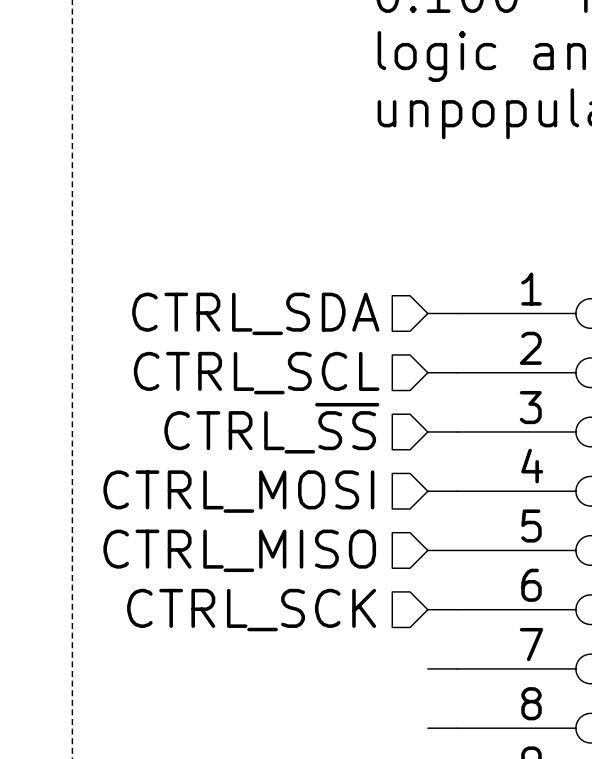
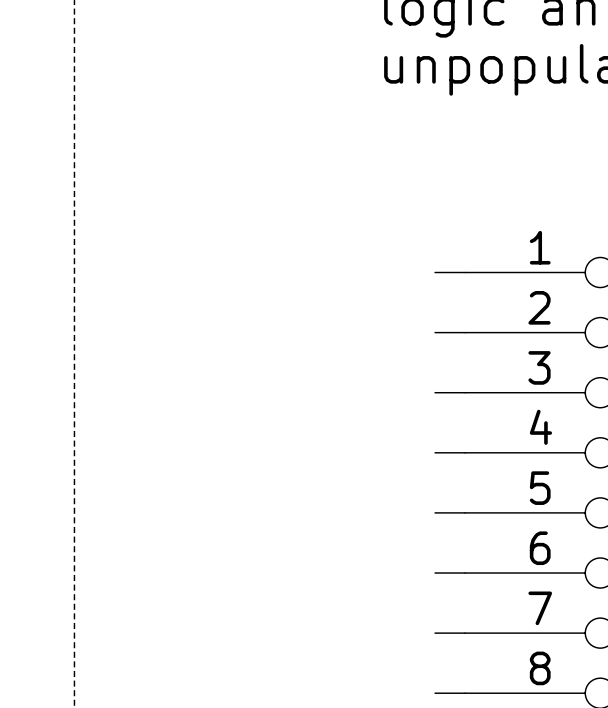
hierarchical label: CTRL_SDA (255, 313) -> none
hierarchical label: CTRL_SCL (256, 373) -> none
hierarchical label: CTRL_~{SS} (271, 428) -> none
hierarchical label: CTRL_MOSI (238, 491) -> none
hierarchical label: CTRL_MISO (239, 550) -> none
hierarchical label: CTRL_SCK (251, 610) -> none

